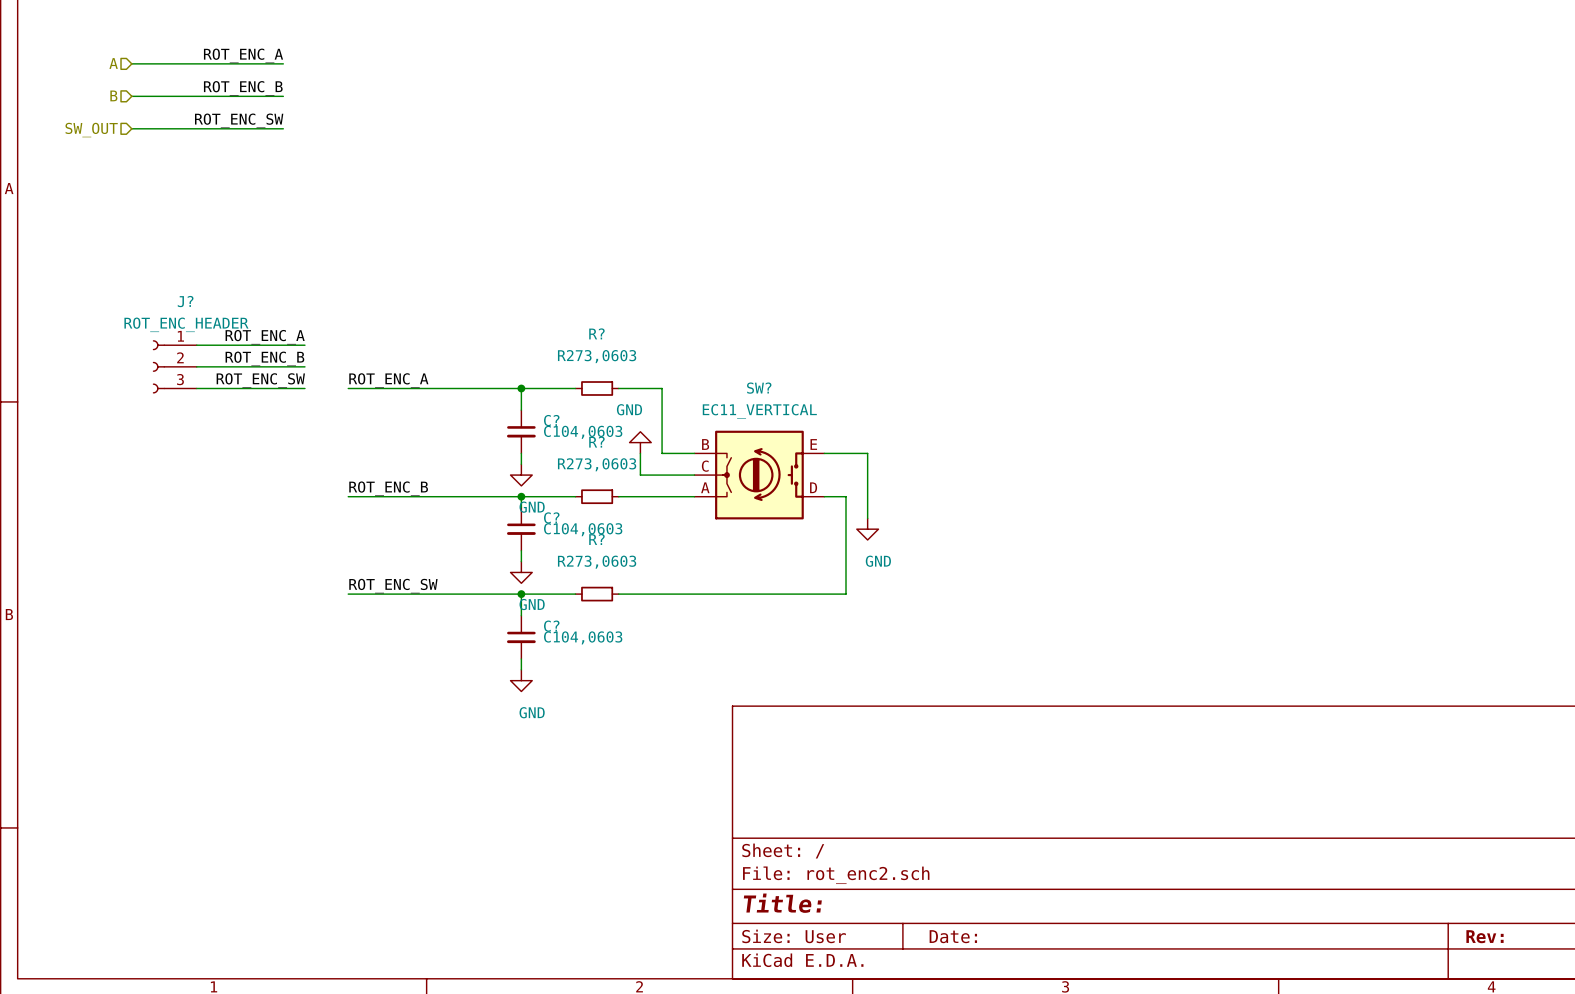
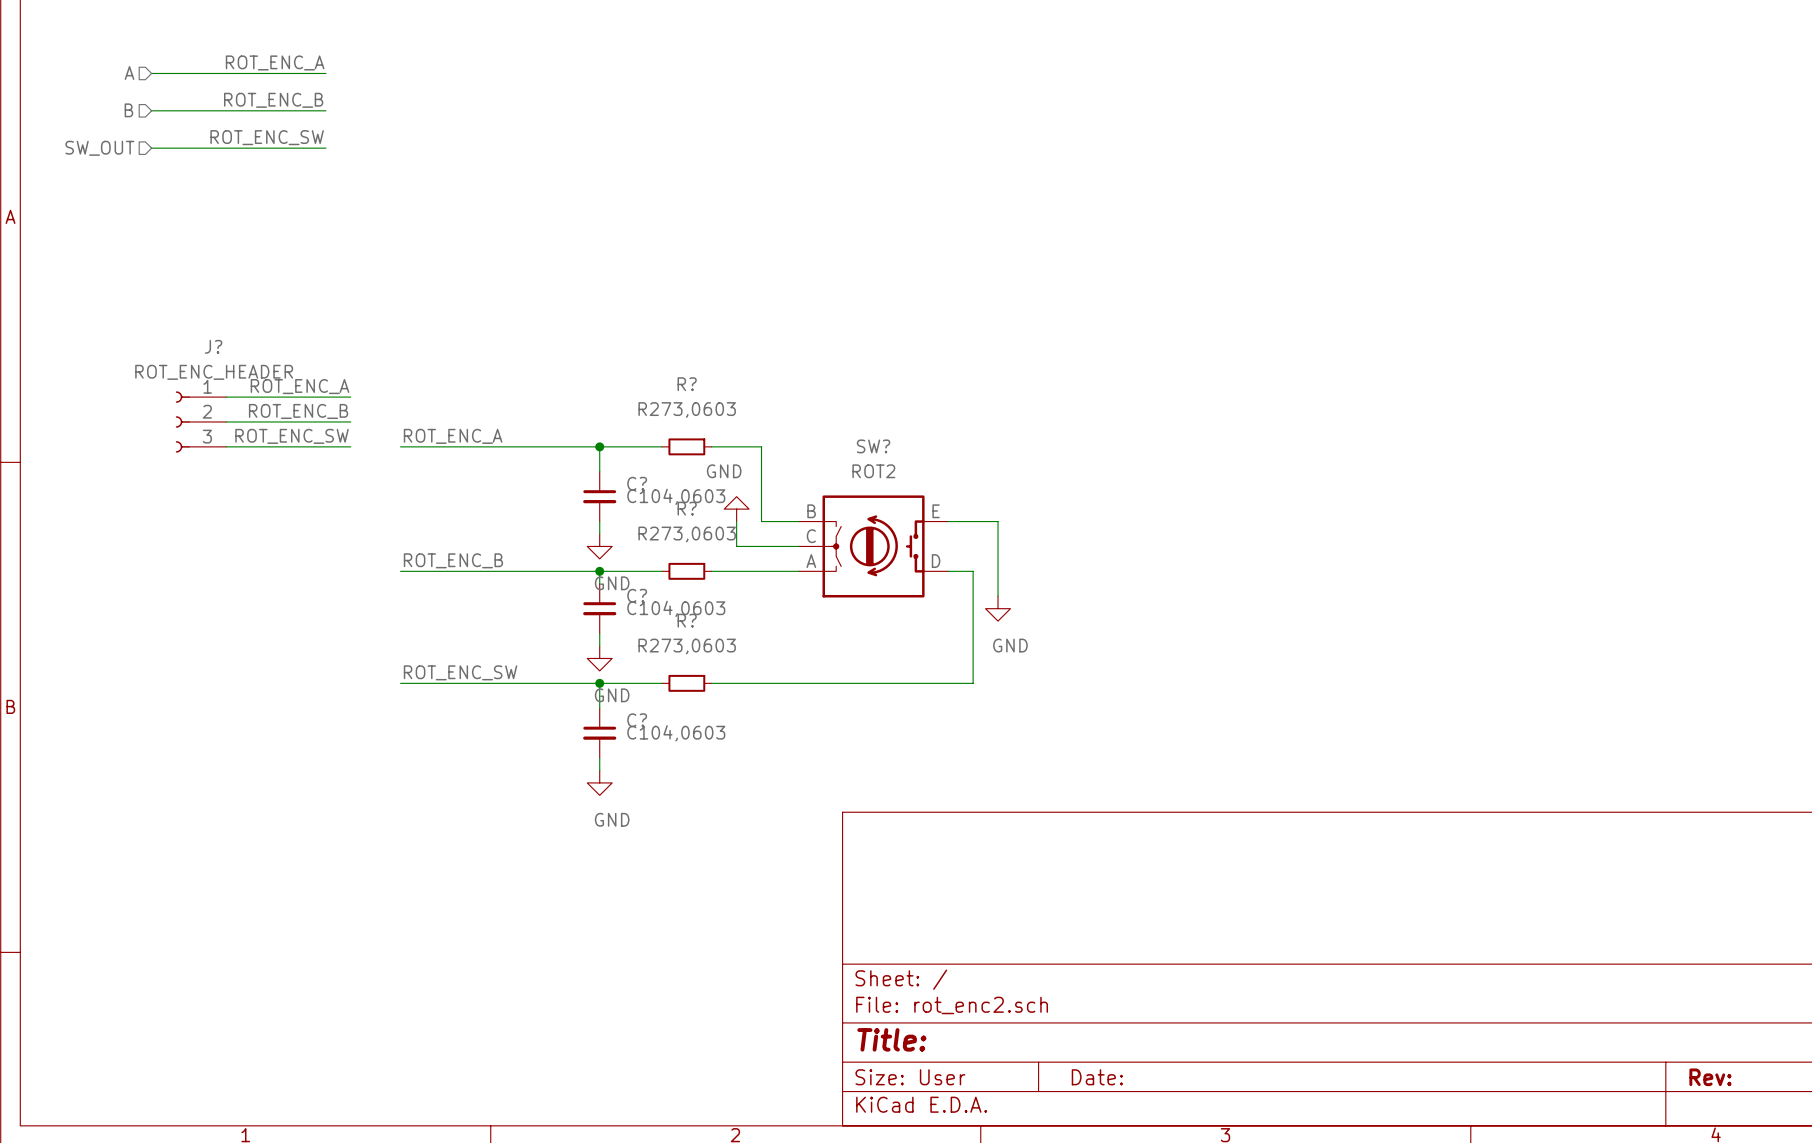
SW? value: EC11_VERTICAL (759, 411) -> ROT2 (873, 471)

